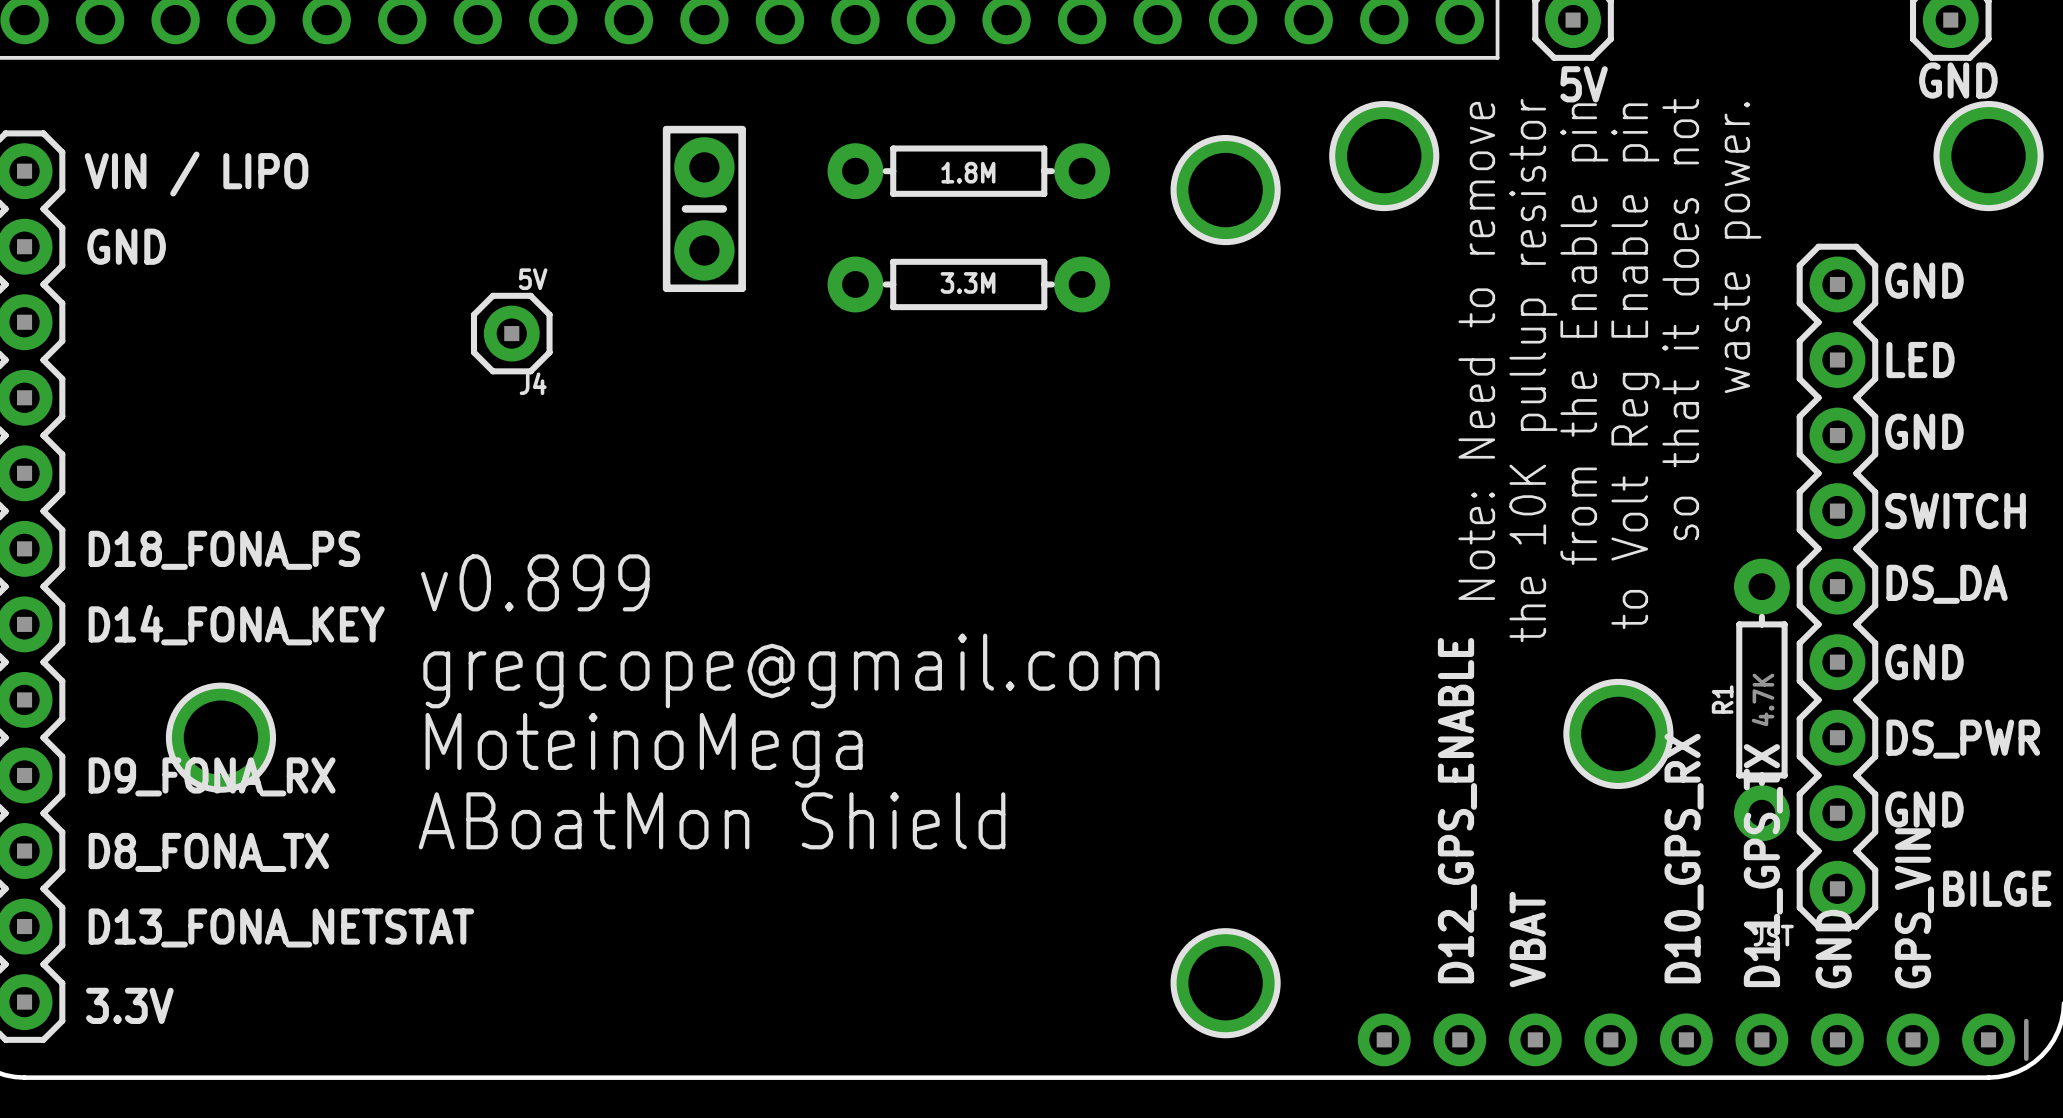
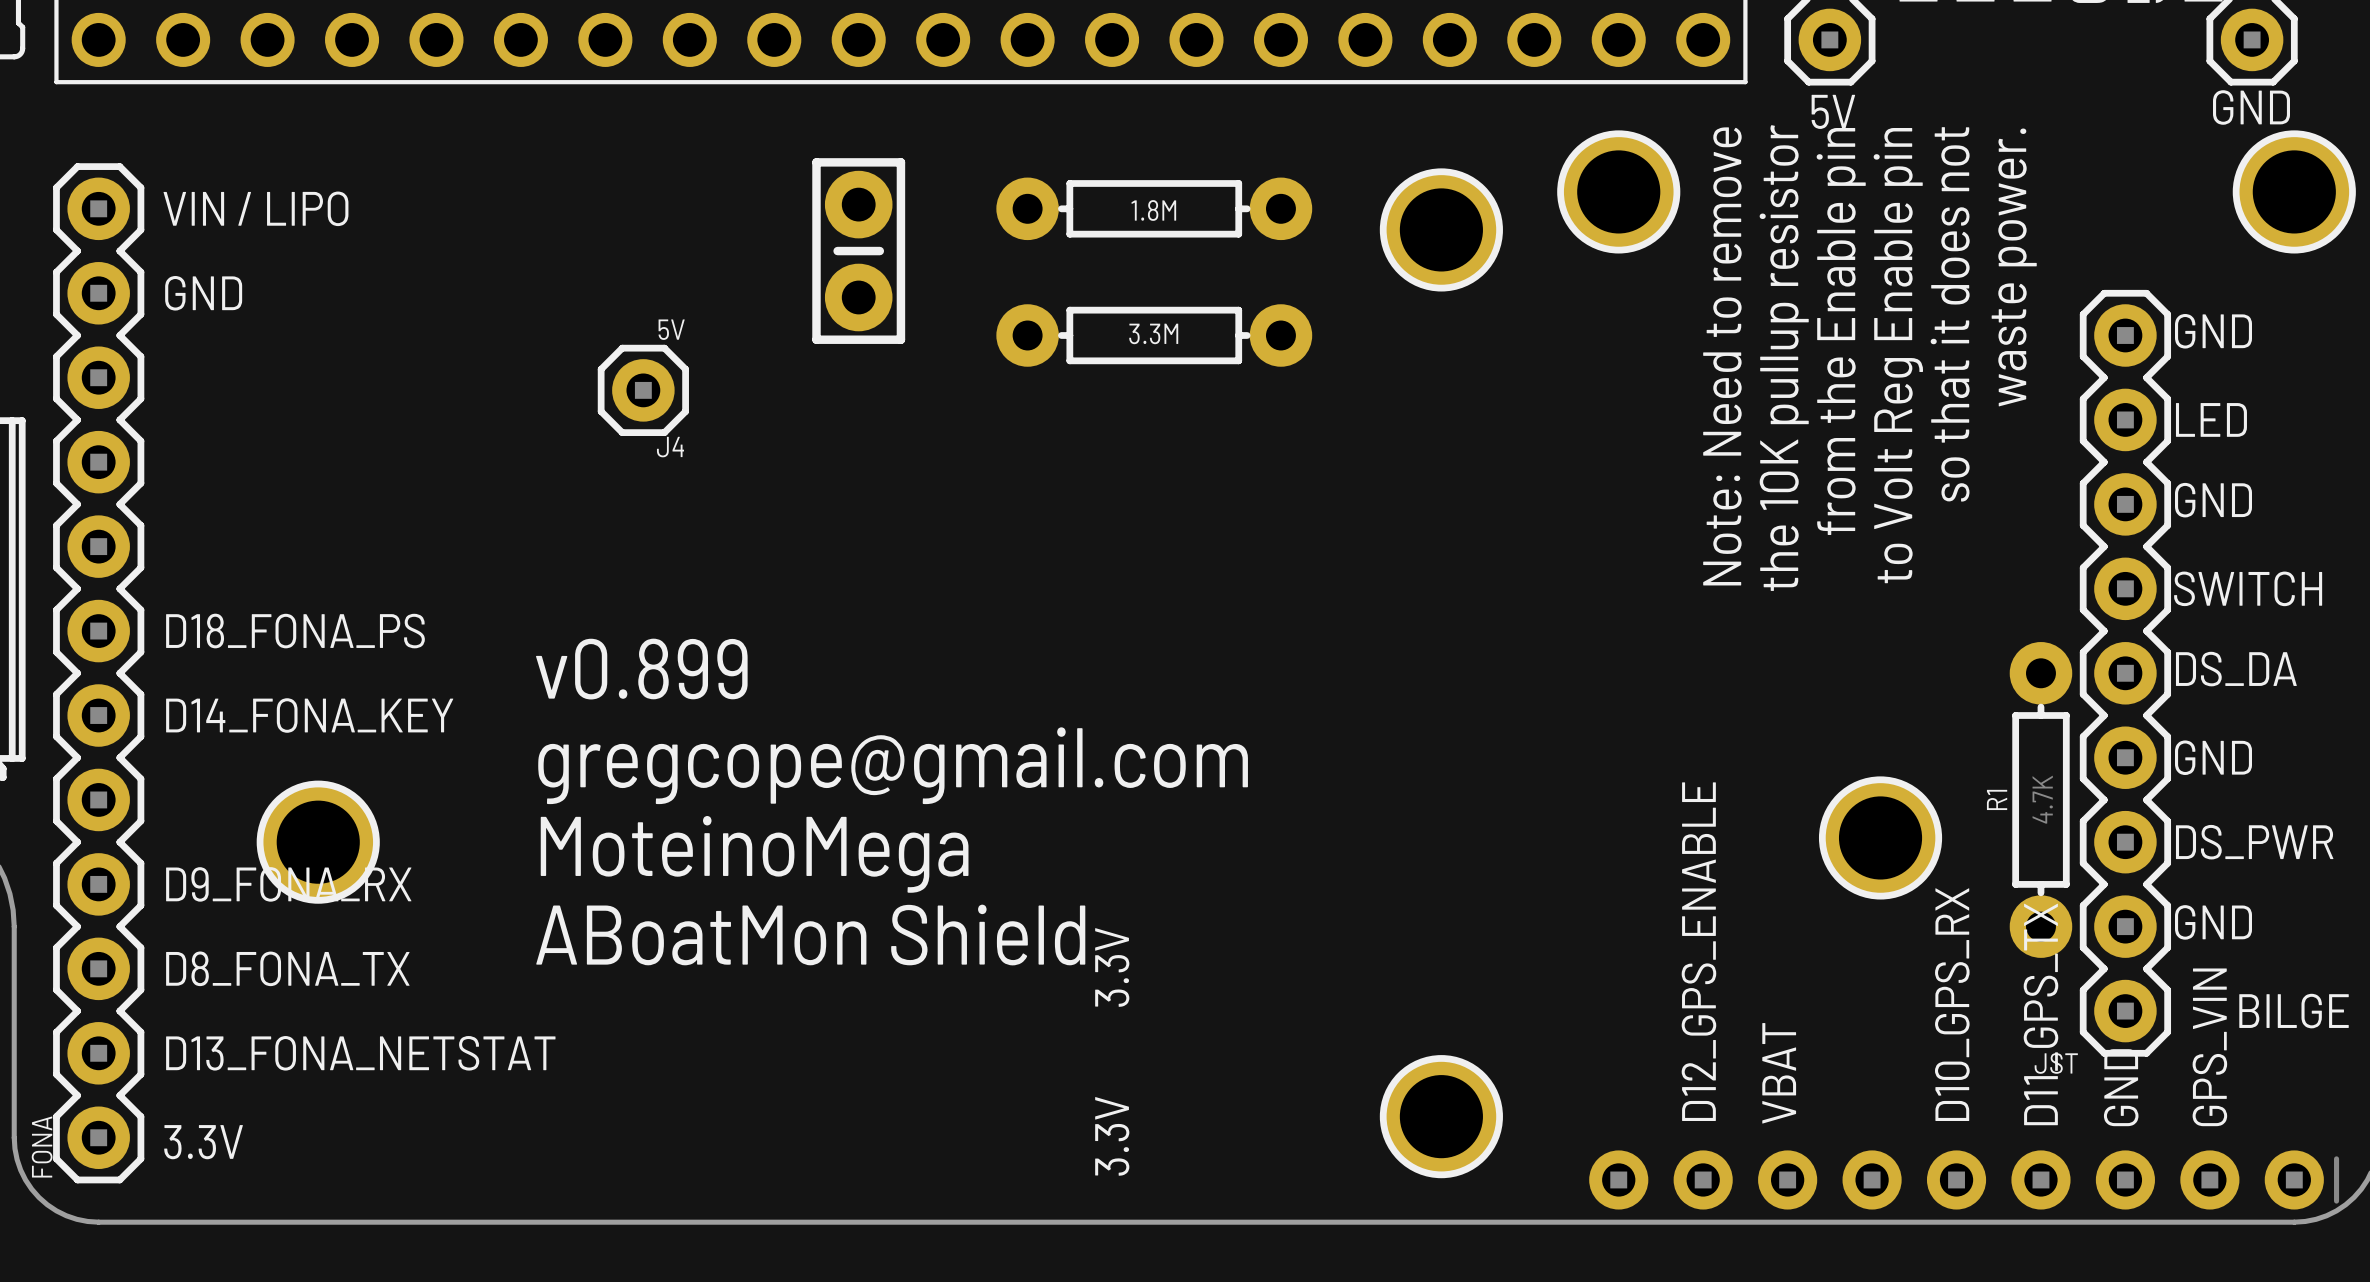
text: none -> 3.3V (1112, 967)
text: none -> 3.3V (1112, 1136)

